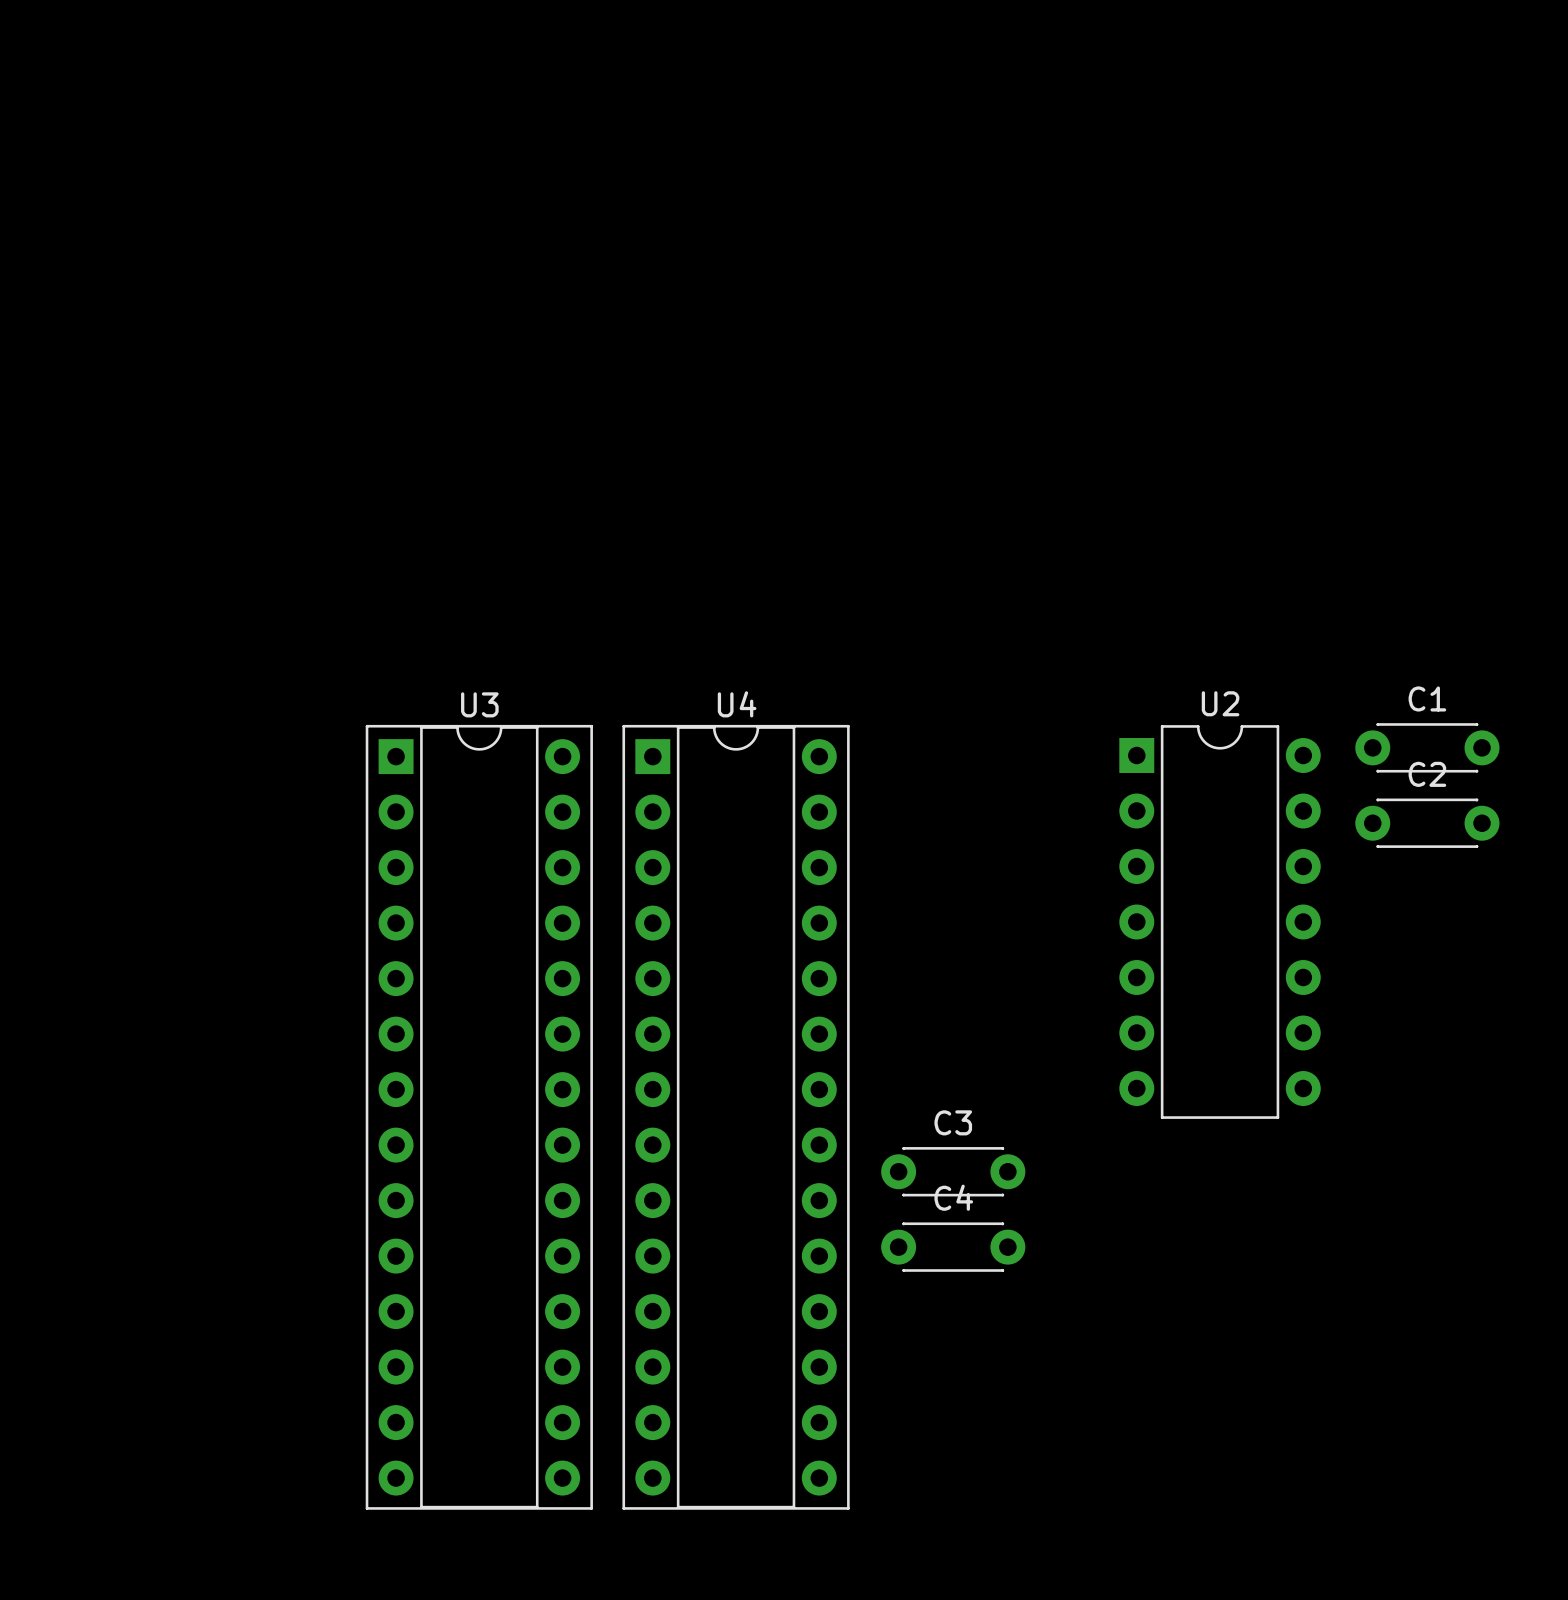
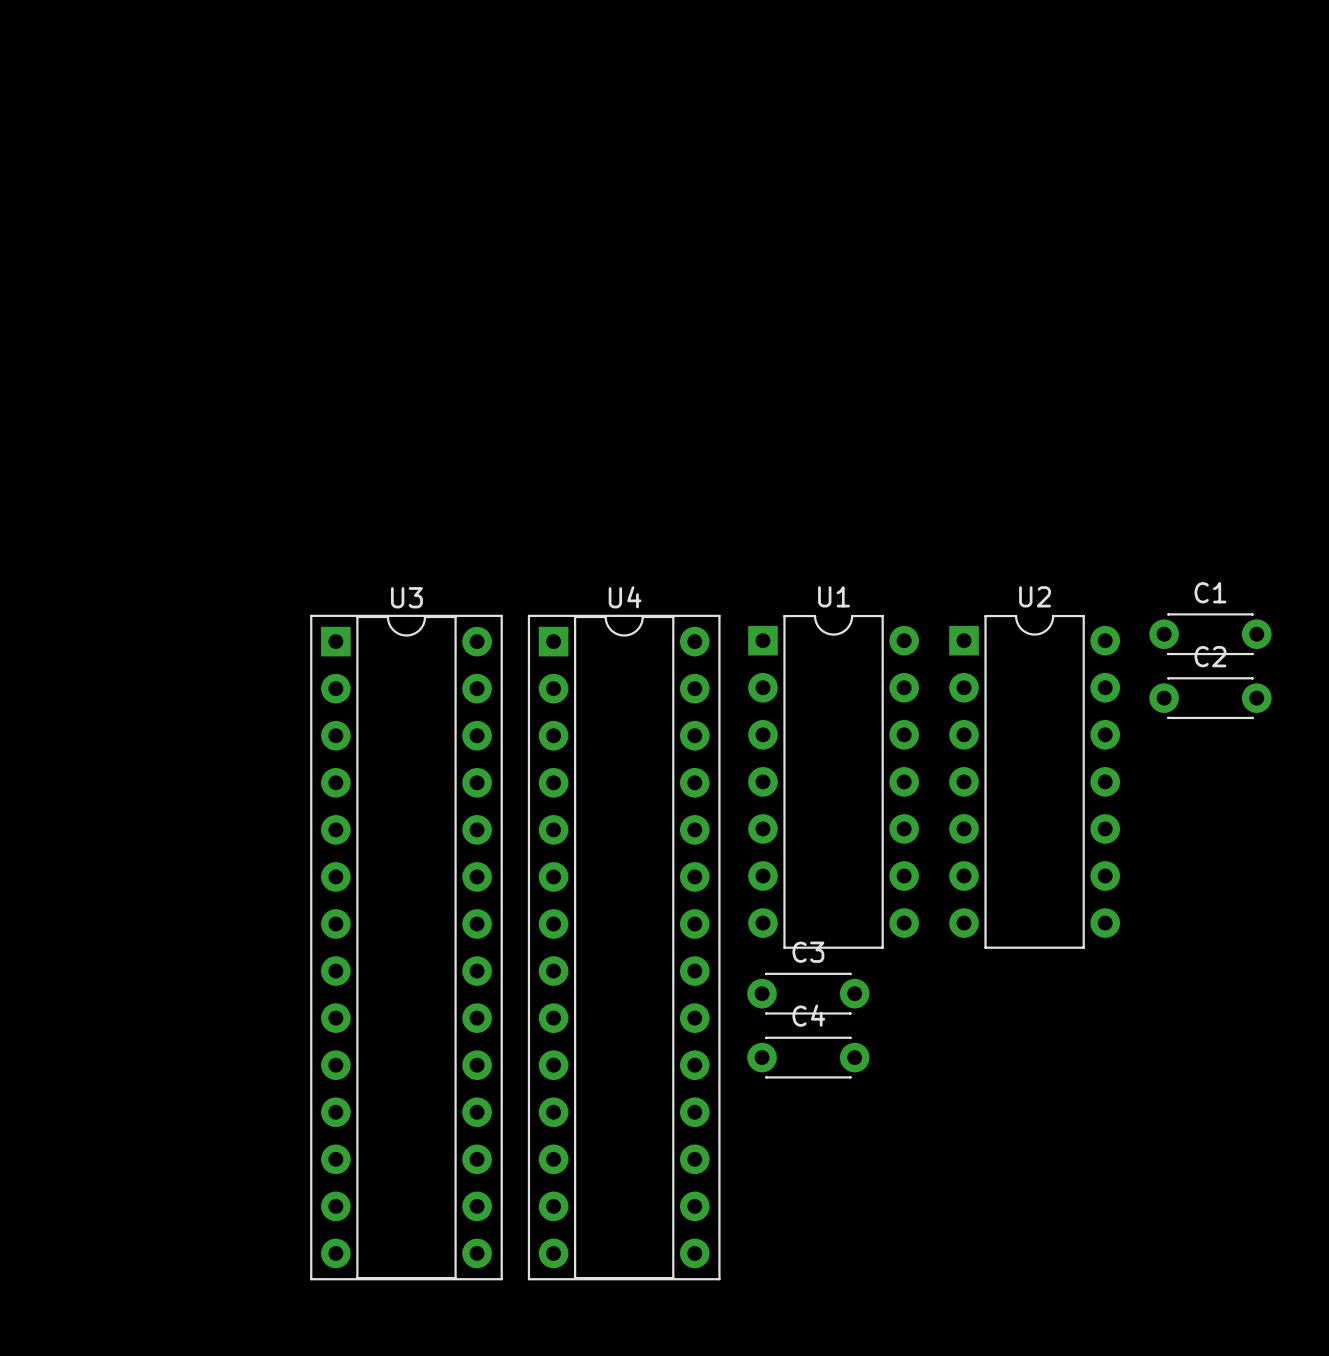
U1: none -> (833, 781)

